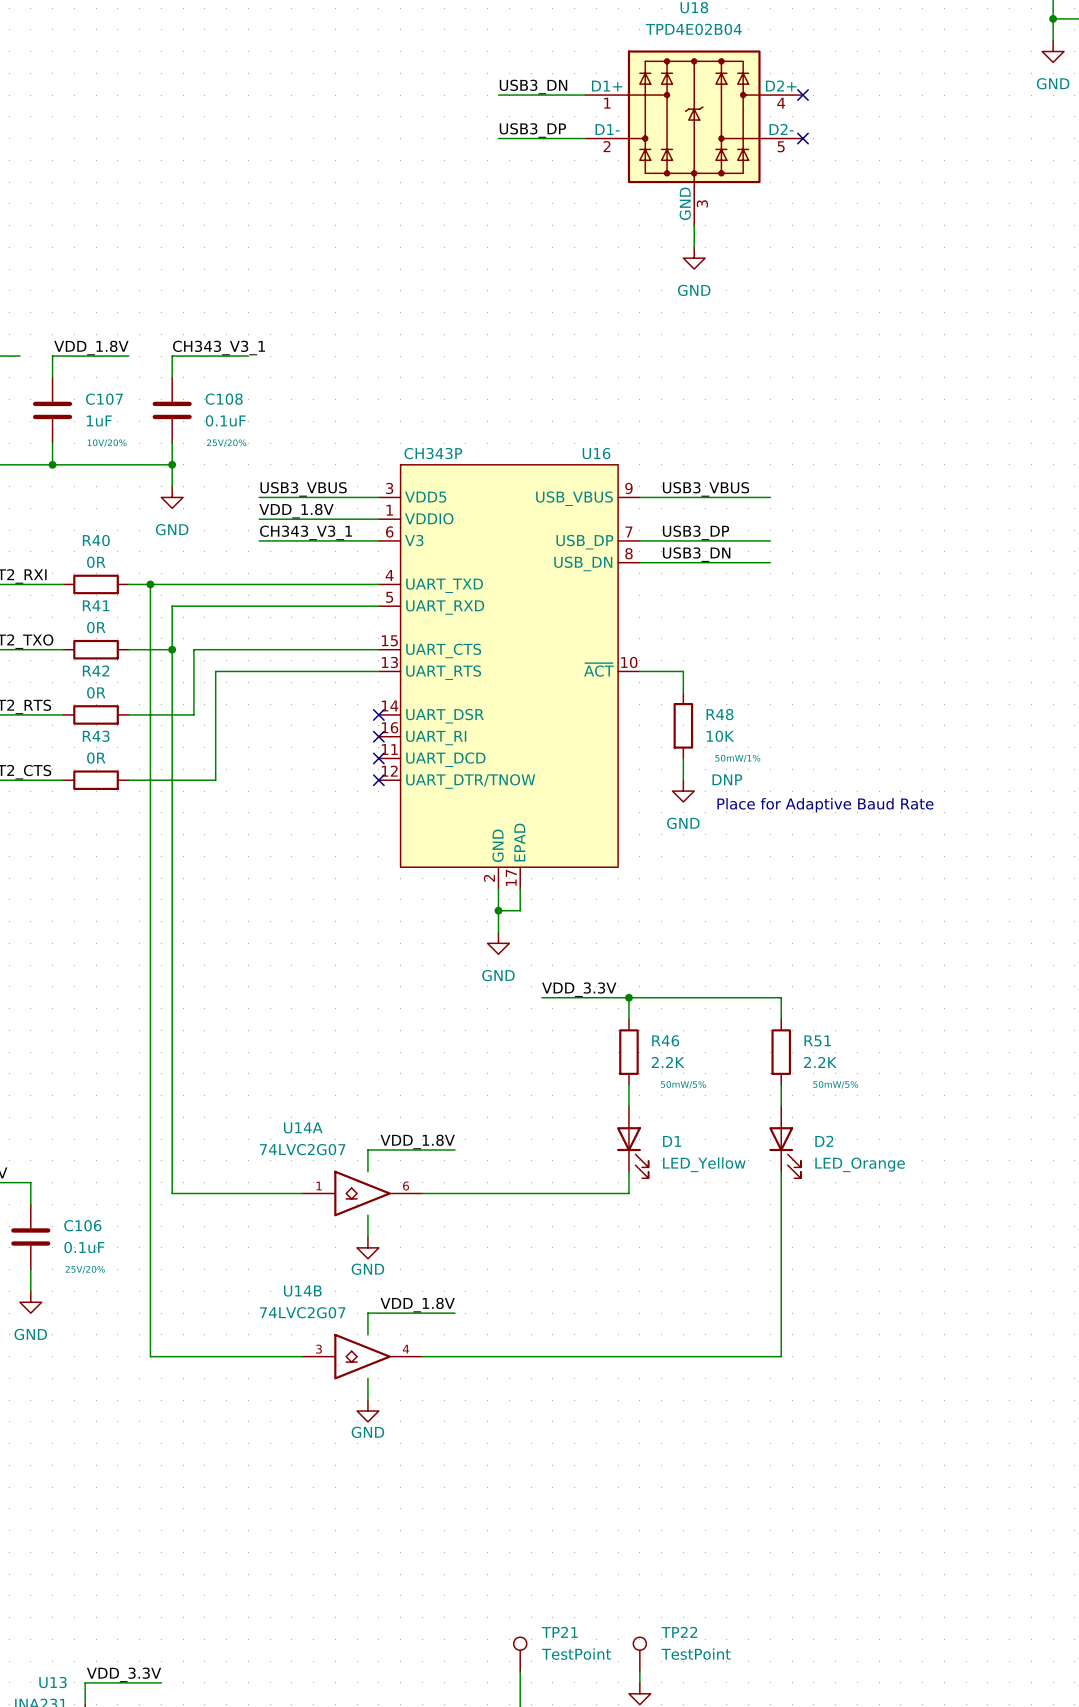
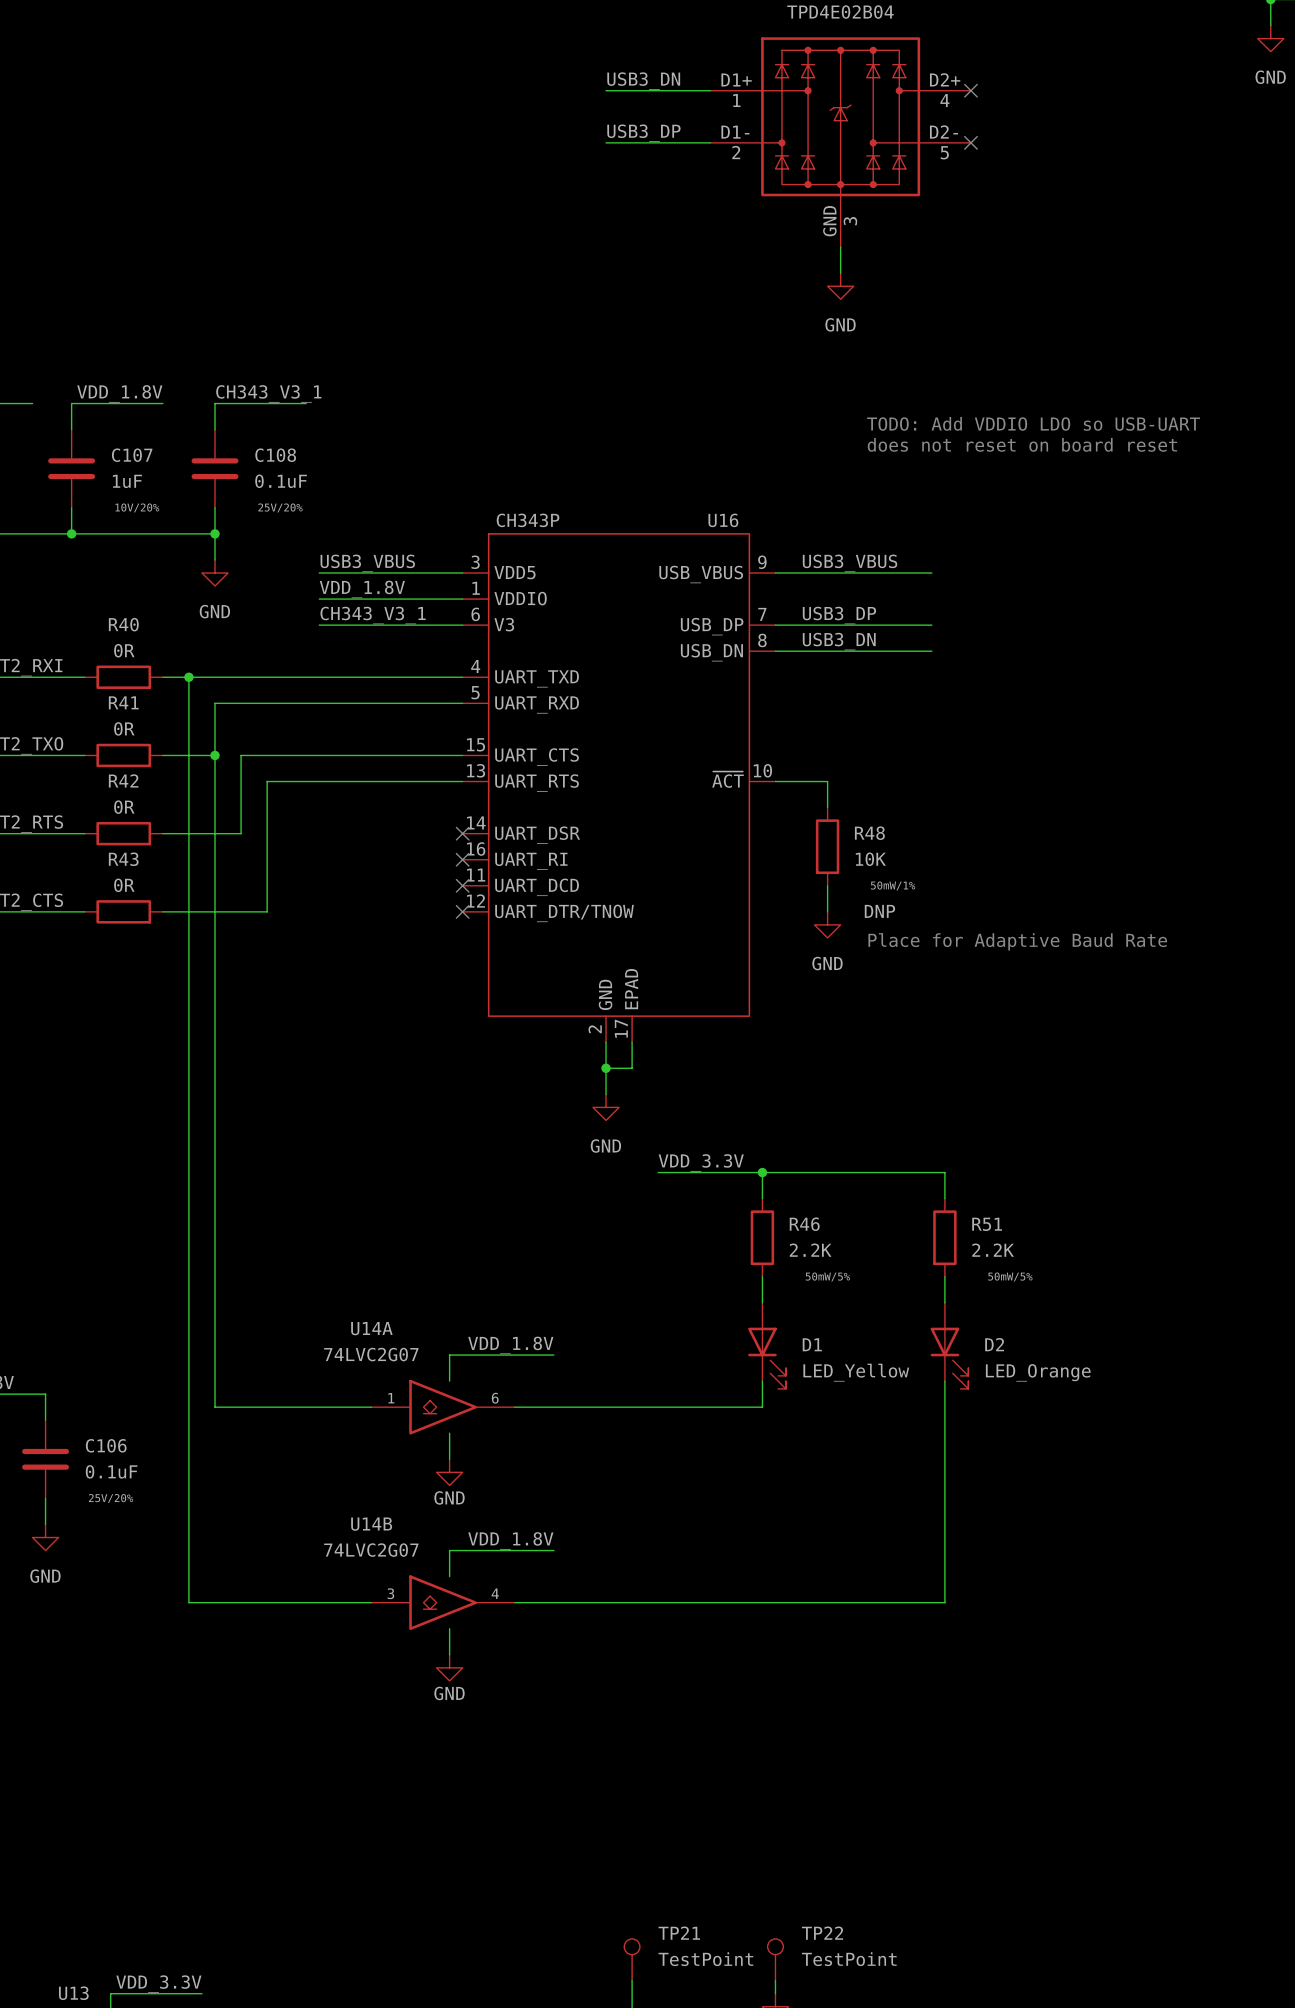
text: none -> TODO: Add VDDIO LDO so USB-UART (1033, 423)
text: none -> does not reset on board reset (1022, 444)

